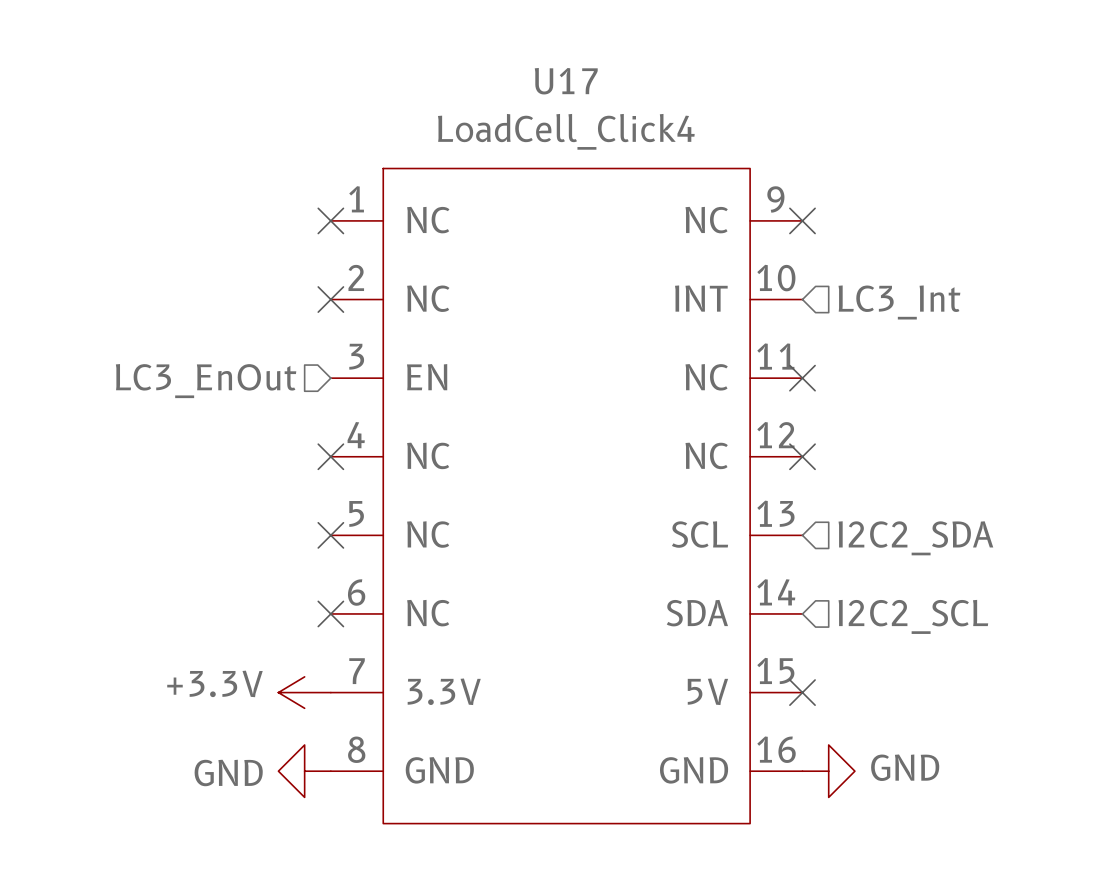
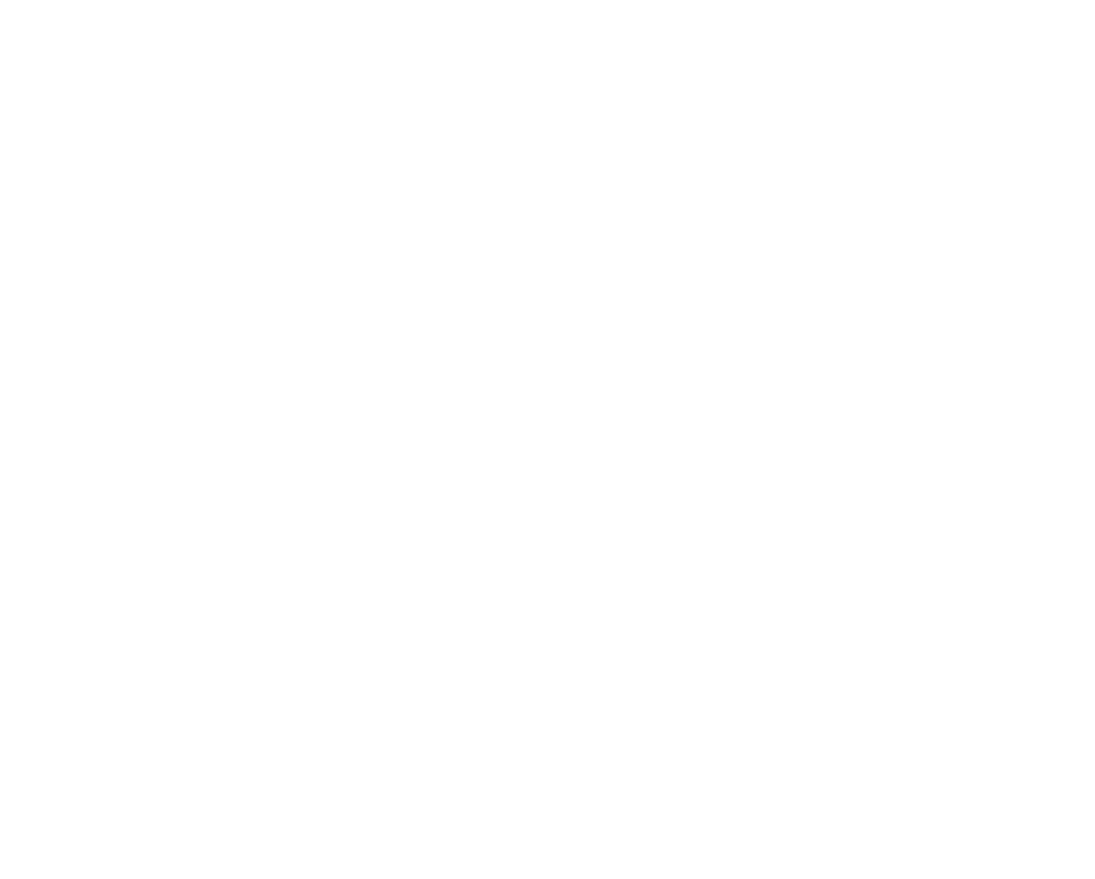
no-connect mark: (330, 220) -> none
no-connect mark: (802, 220) -> none
no-connect mark: (330, 299) -> none
hierarchical label: LC3_Int (899, 302) -> none
no-connect mark: (802, 378) -> none
hierarchical label: LC3_EnOut (206, 381) -> none
no-connect mark: (330, 456) -> none
no-connect mark: (802, 456) -> none
U17: LoadCell_Click4 (566, 496) -> none
no-connect mark: (330, 535) -> none
hierarchical label: I2C2_SDA (915, 538) -> none
no-connect mark: (330, 613) -> none
hierarchical label: I2C2_SCL (913, 616) -> none
power symbol: +3.3V (304, 692) -> none
no-connect mark: (802, 692) -> none
power symbol: GND (304, 771) -> none
power symbol: GND (828, 771) -> none

